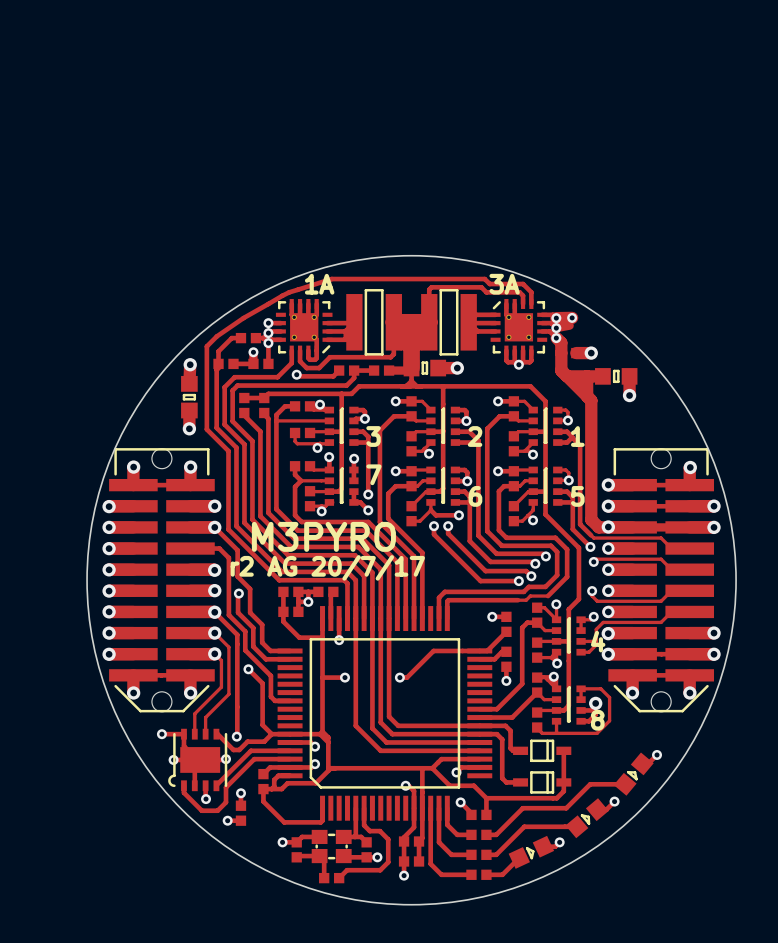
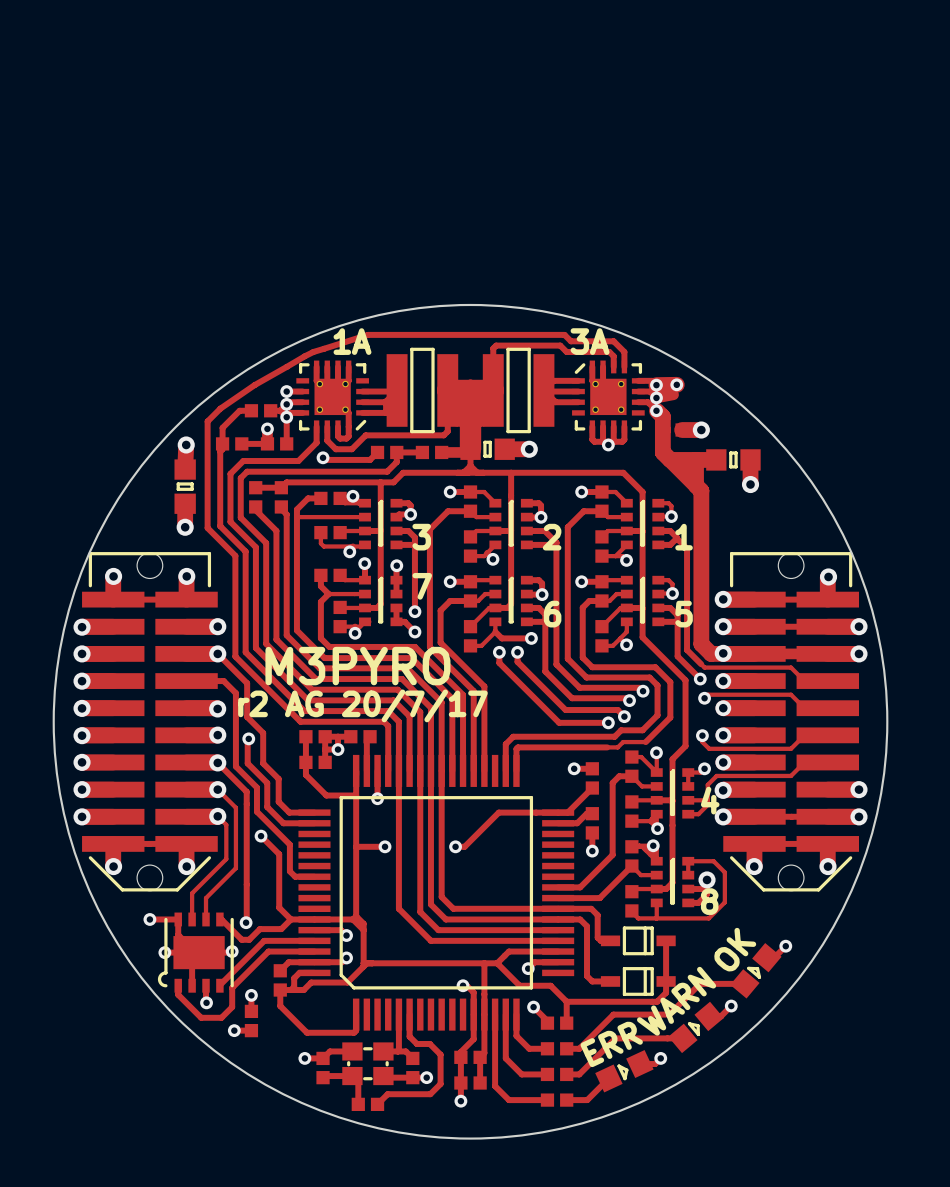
text: none -> OK (735, 949)
text: none -> WARN (676, 1001)
text: none -> ERR (611, 1044)

